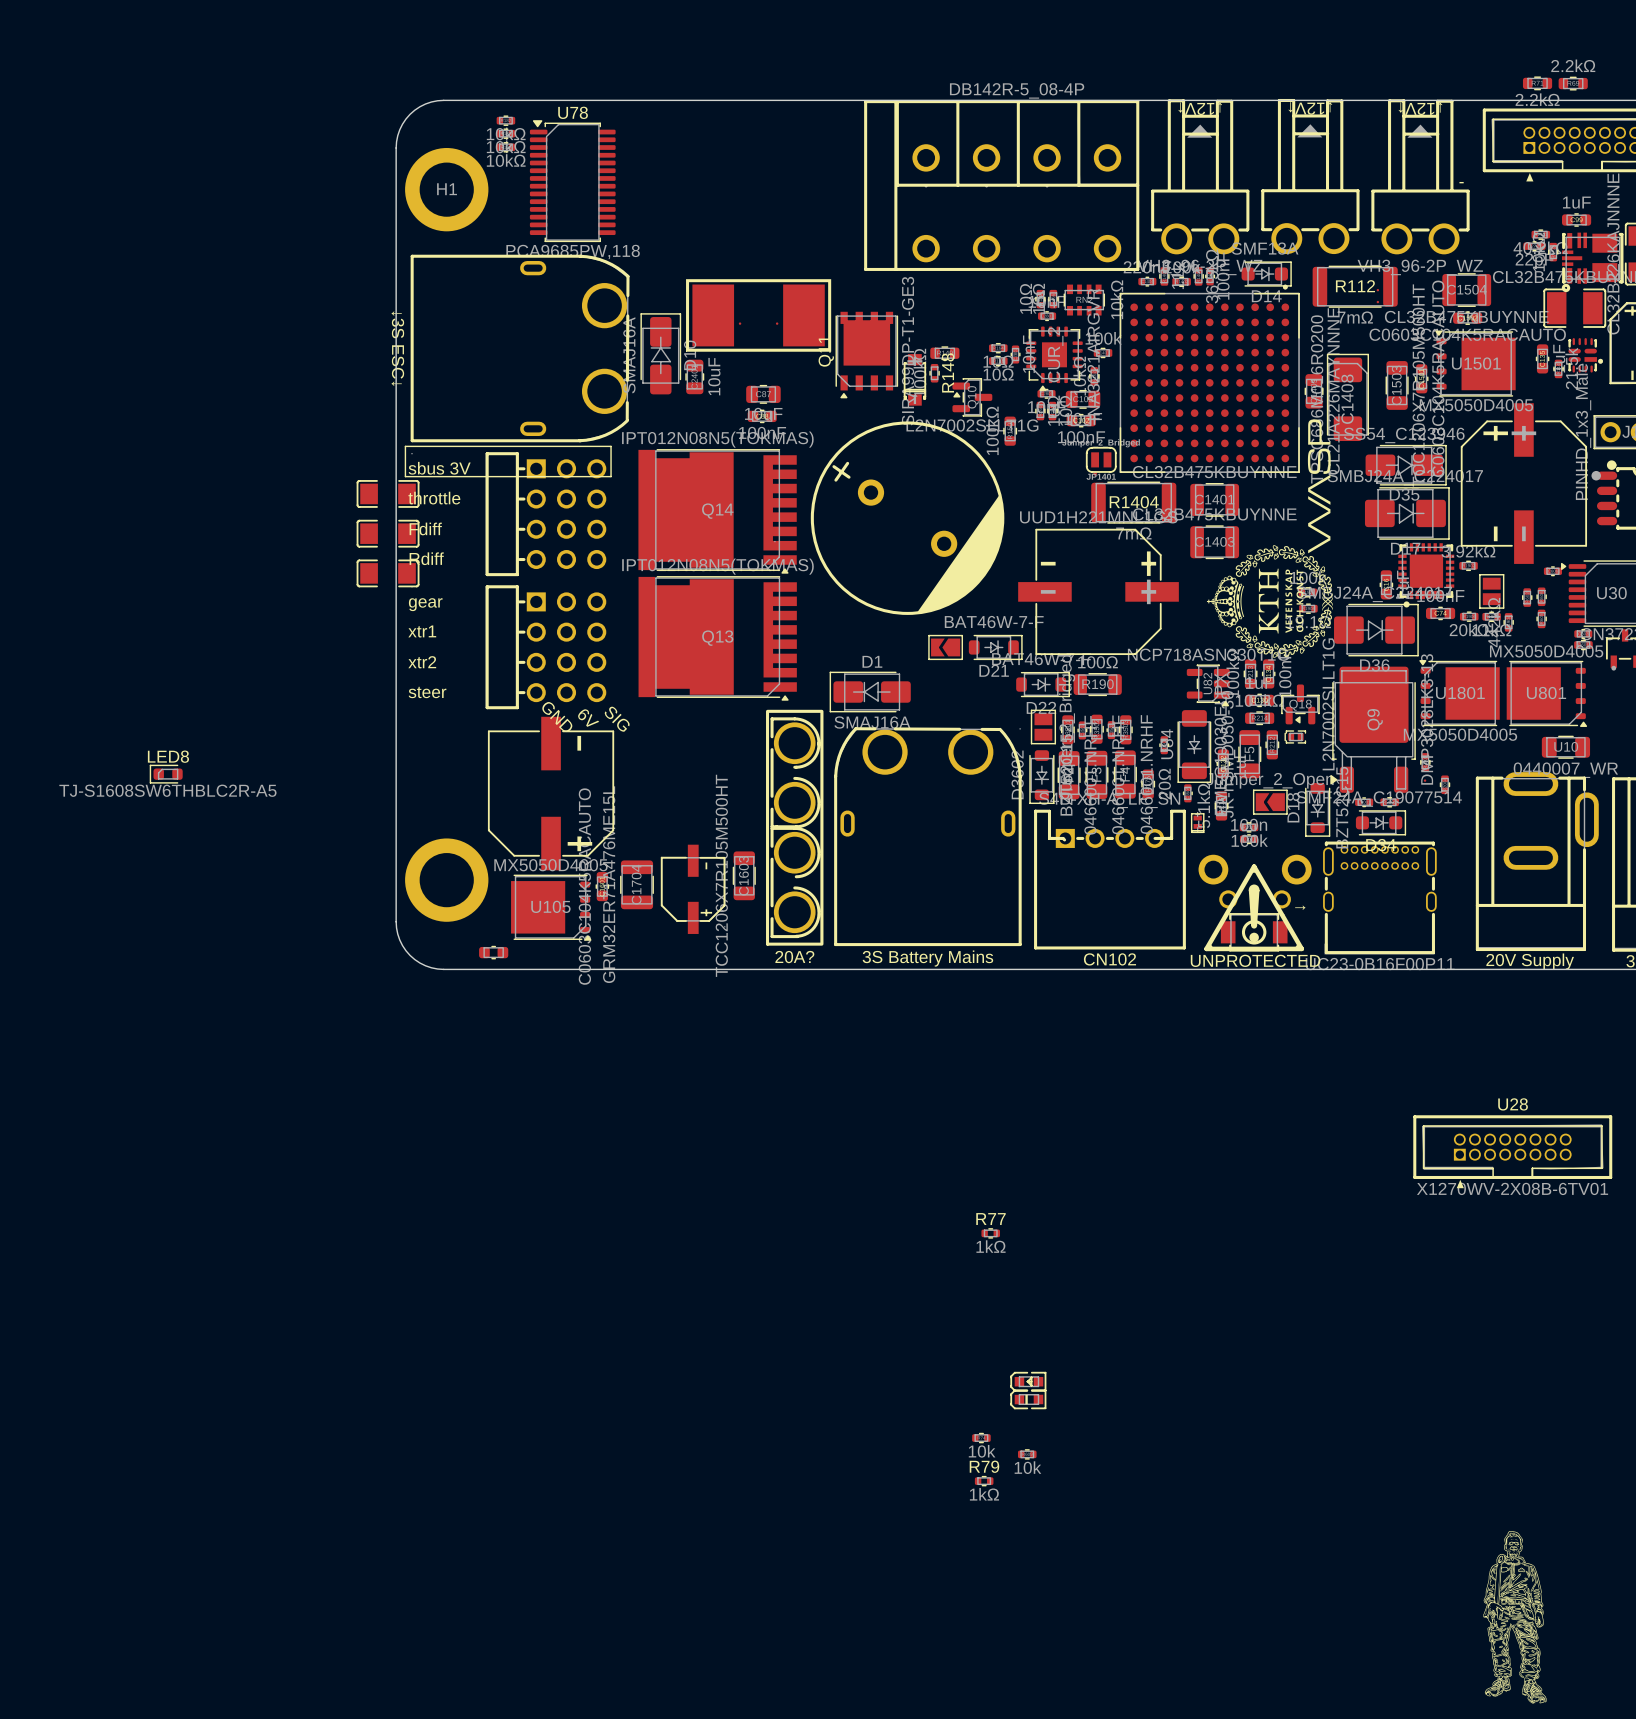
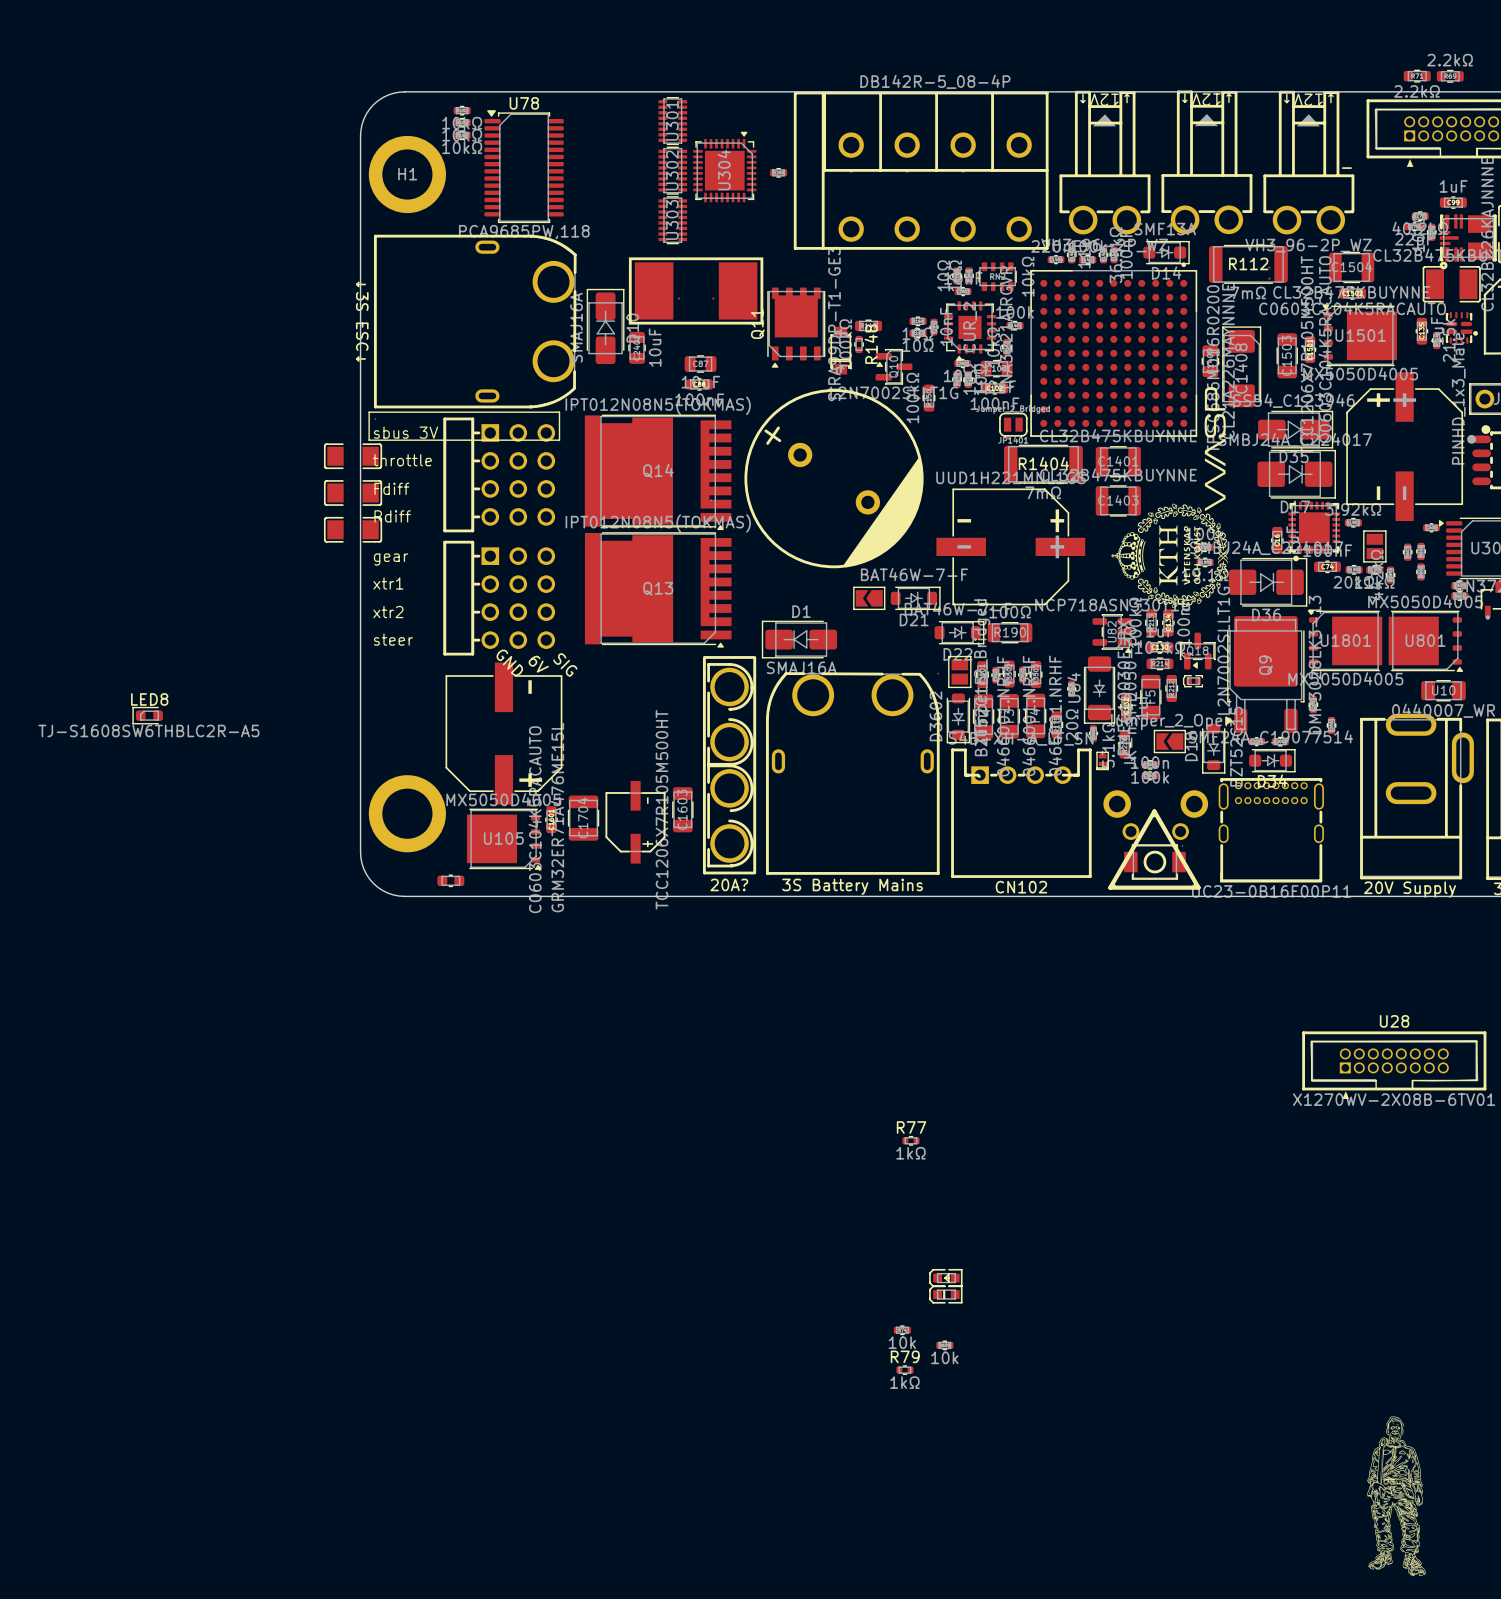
U301: none -> (672, 121)
U304: none -> (724, 167)
U302: none -> (672, 170)
part: none -> (778, 172)
U303: none -> (672, 220)
drawing shape: [1190, 864, 1321, 967] -> [1108, 809, 1201, 890]

